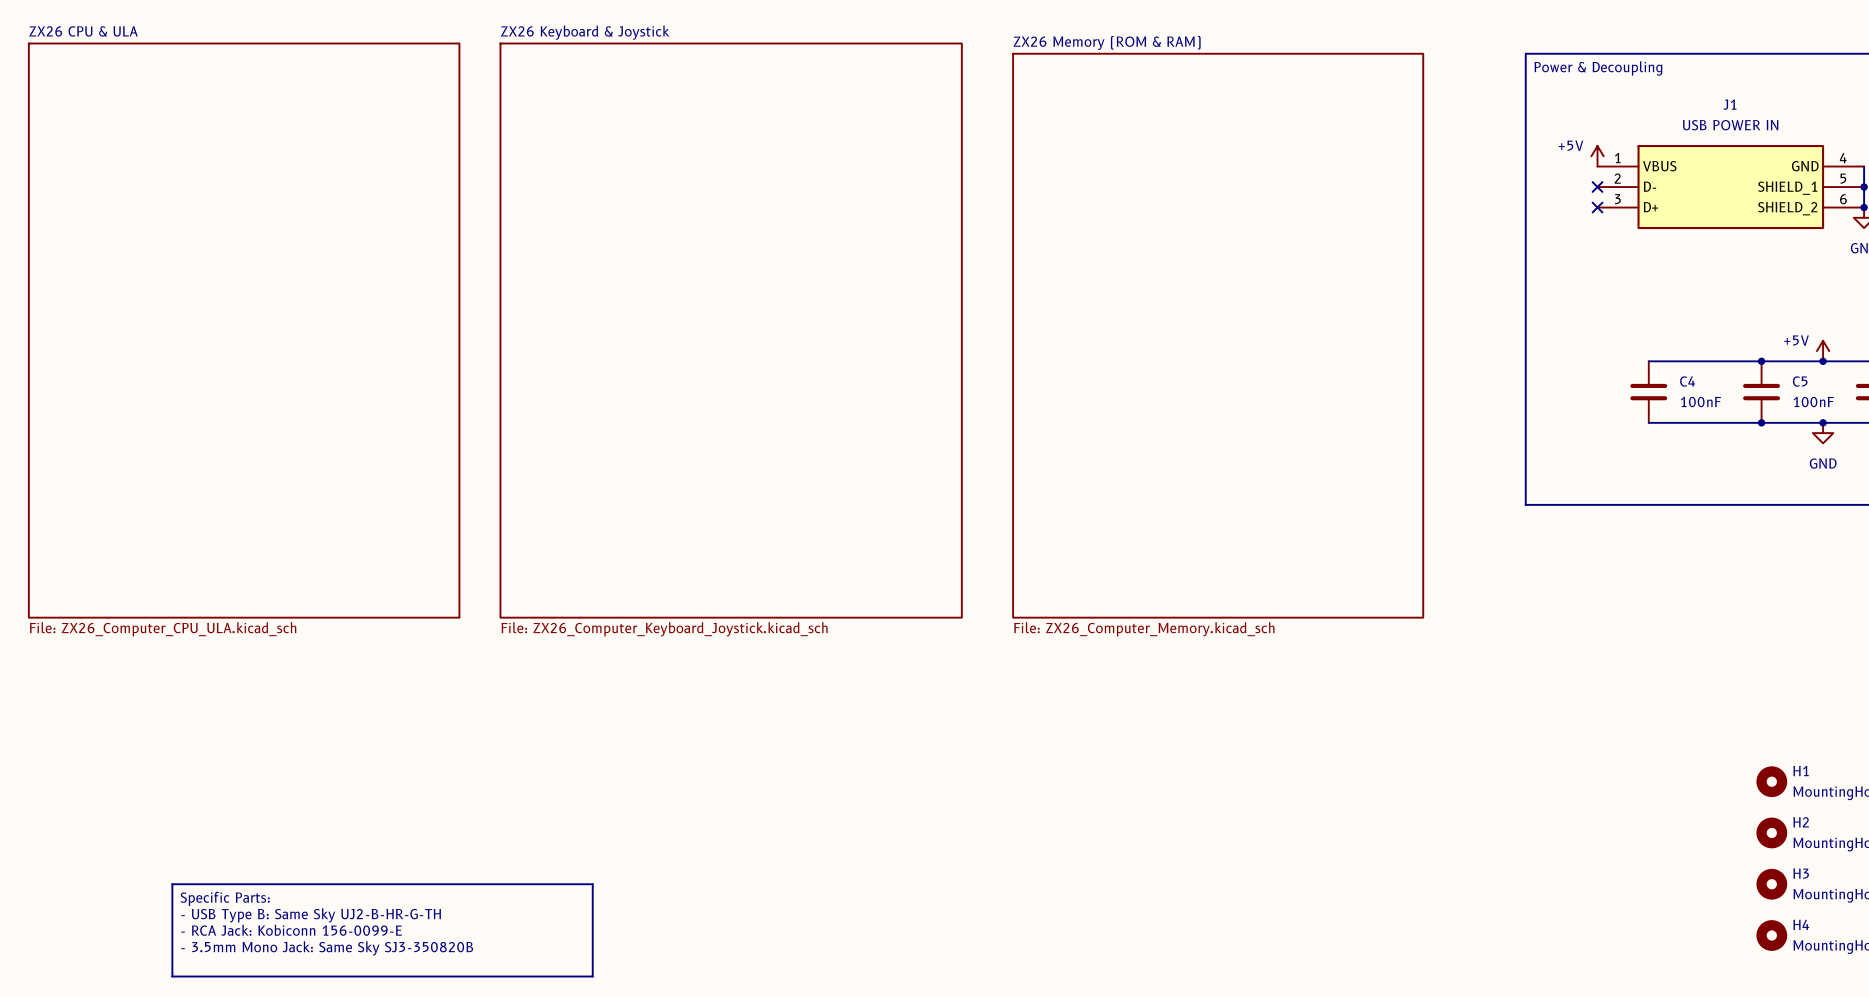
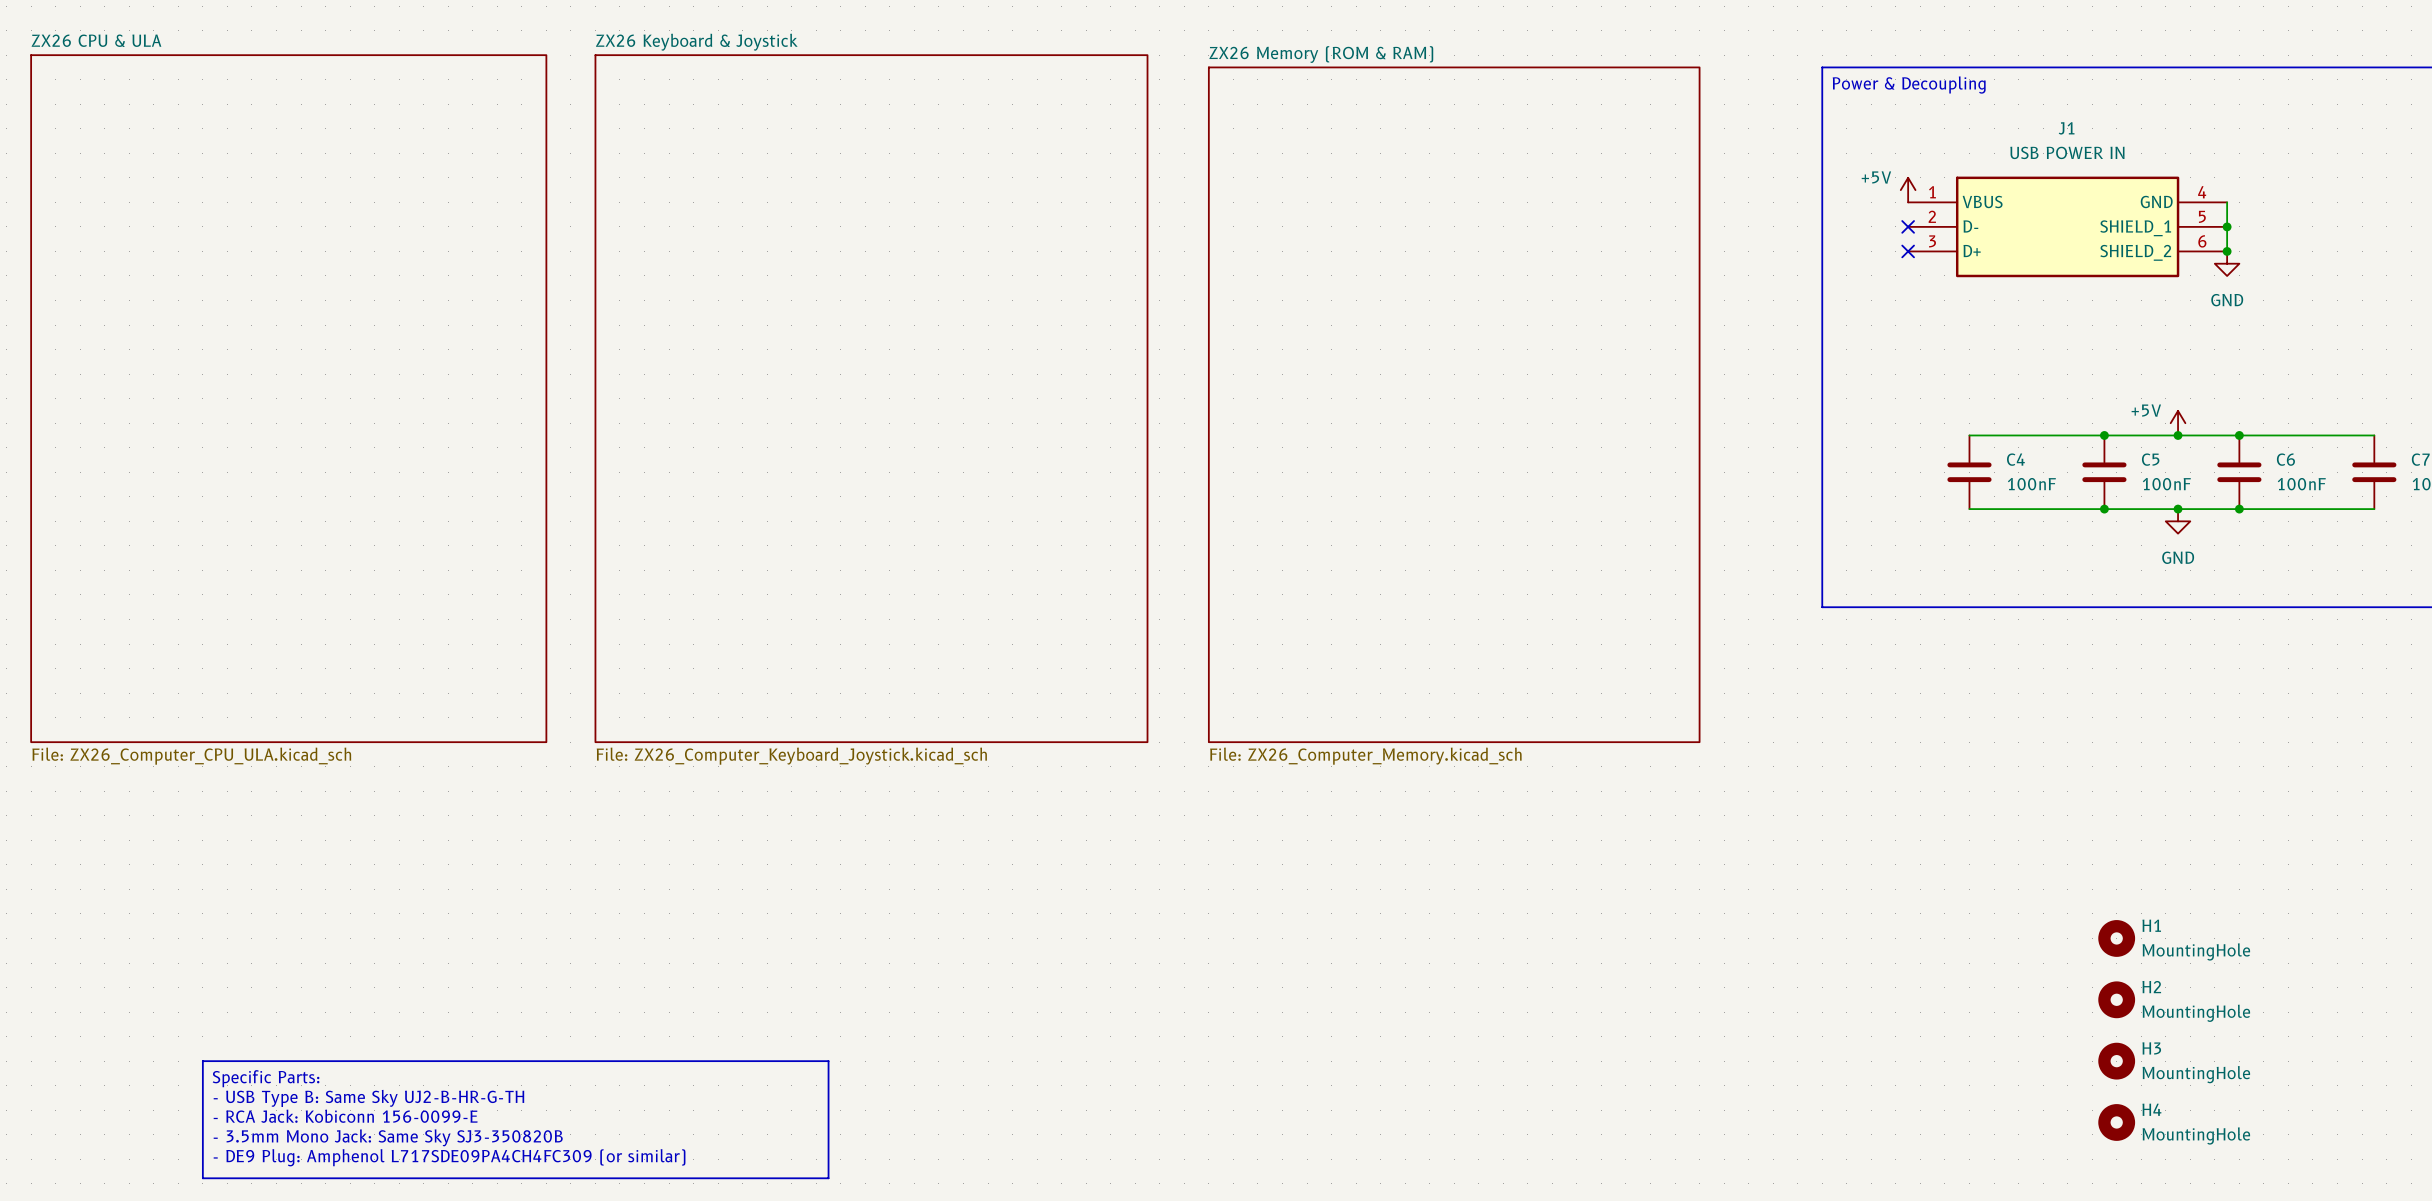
line: (592, 884) (592, 976) (172, 976) -> (705, 1061) (828, 1061) (828, 1178) (202, 1178) (202, 1171)
text: none -> - DE9 Plug: Amphenol L717SDE09PA4CH4FC309 (or similar) (449, 1157)

